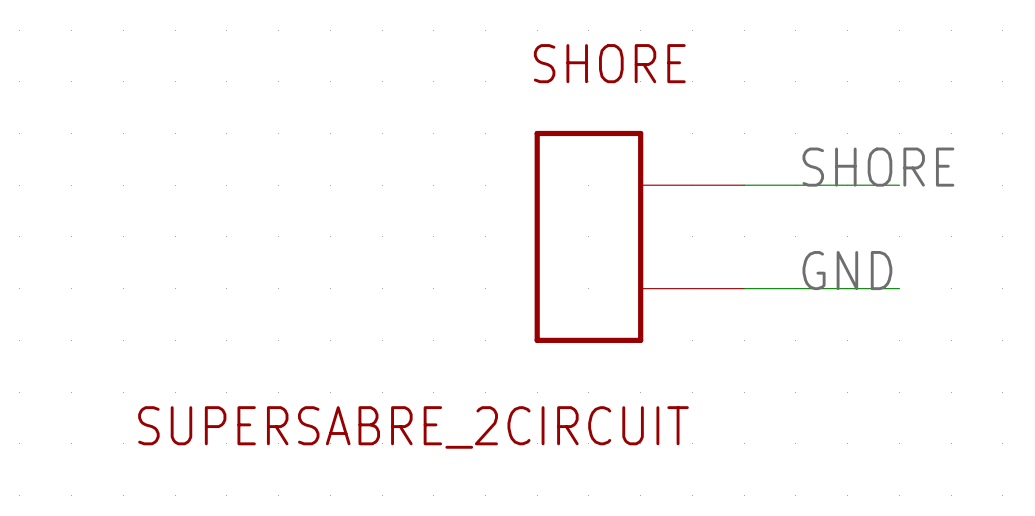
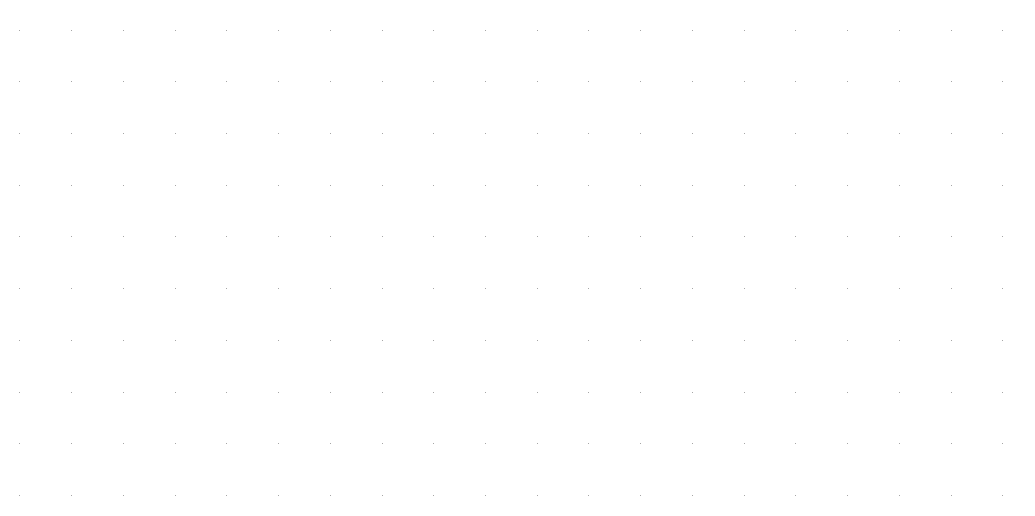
label: SHORE (878, 167) -> none
wire: (744, 185) (899, 185) -> none
SHORE: SUPERSABRE_2CIRCUIT (639, 236) -> none
label: GND (847, 270) -> none
wire: (744, 288) (899, 288) -> none

